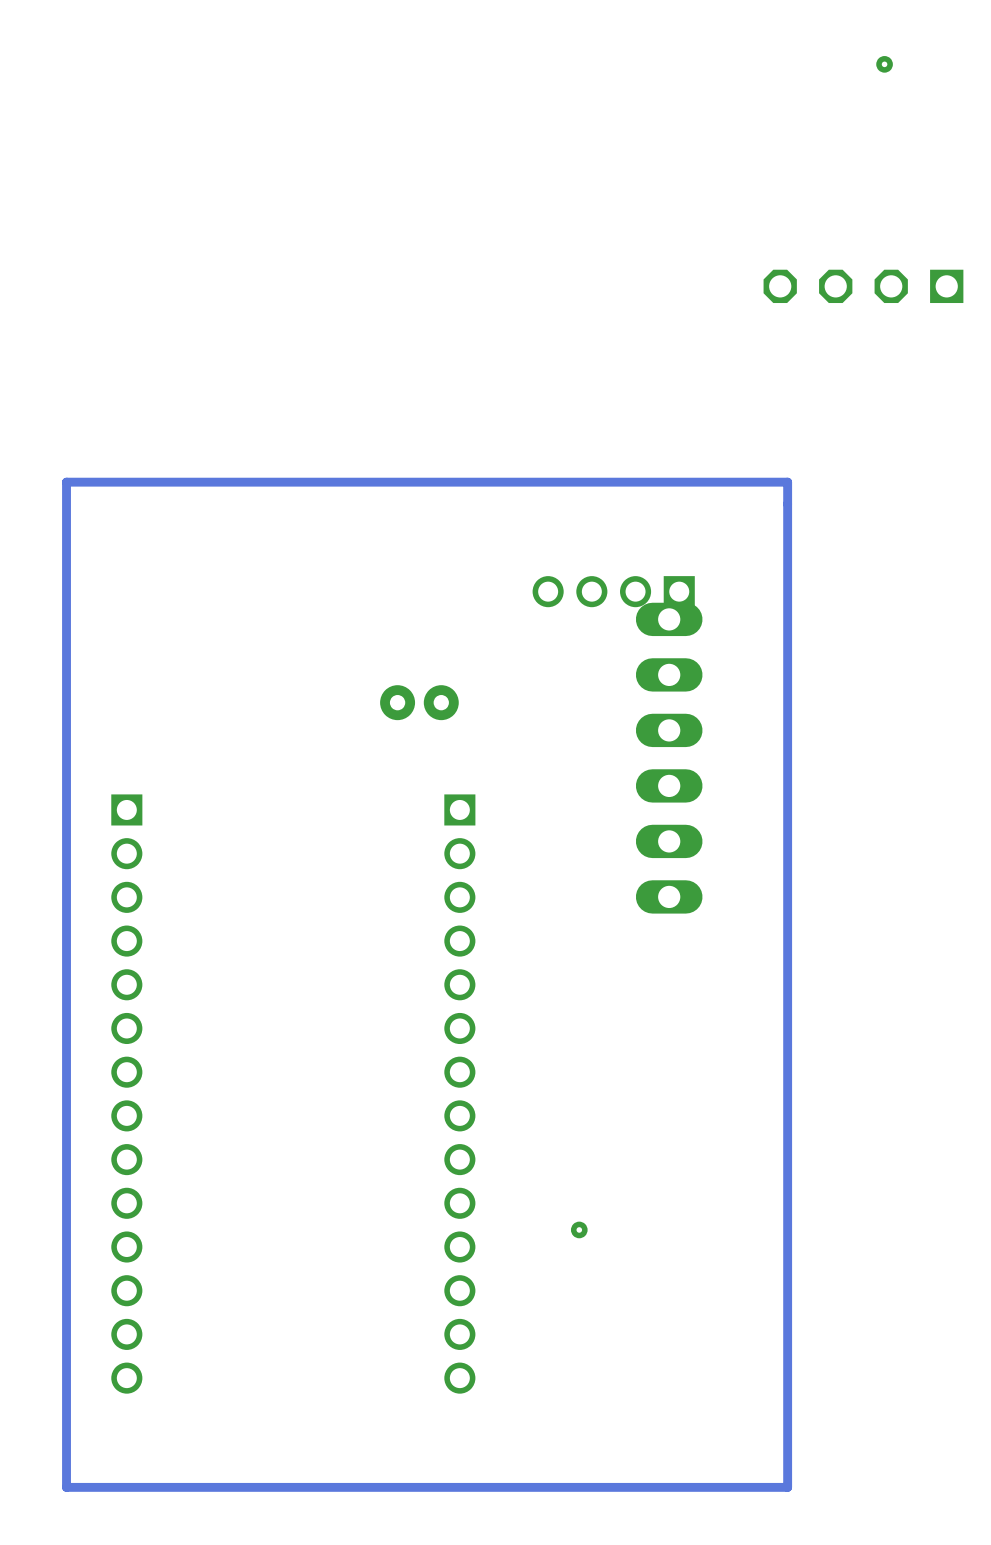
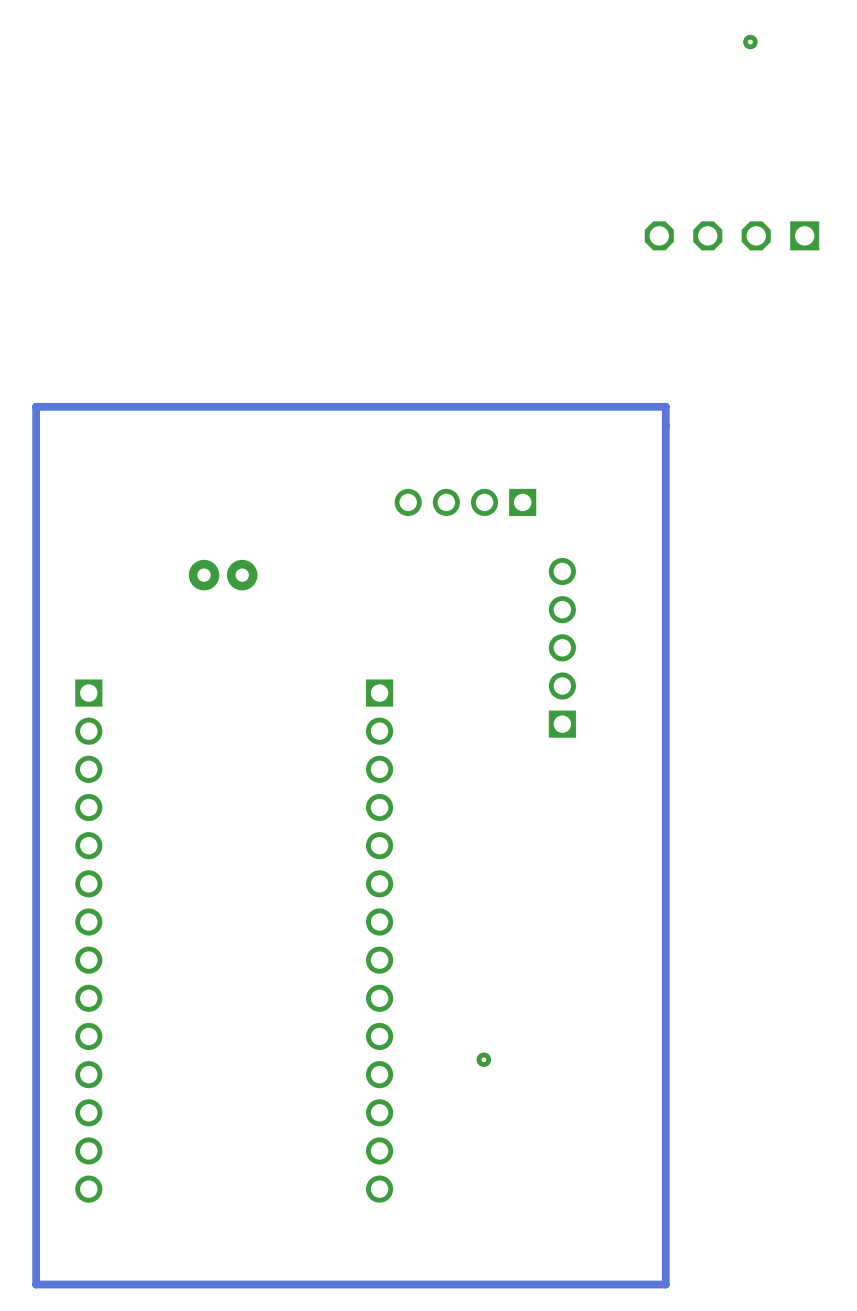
part position: (613, 591) -> (465, 502)
part footprint: [635, 602, 703, 914] -> [548, 557, 576, 738]
part position: (419, 702) -> (223, 575)

